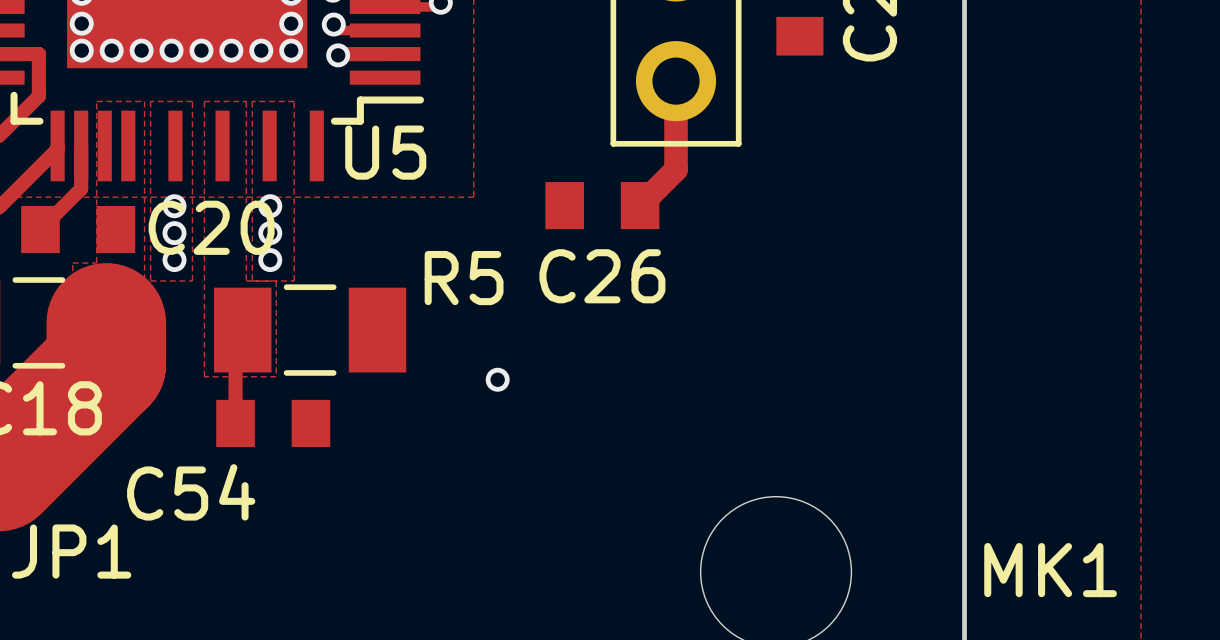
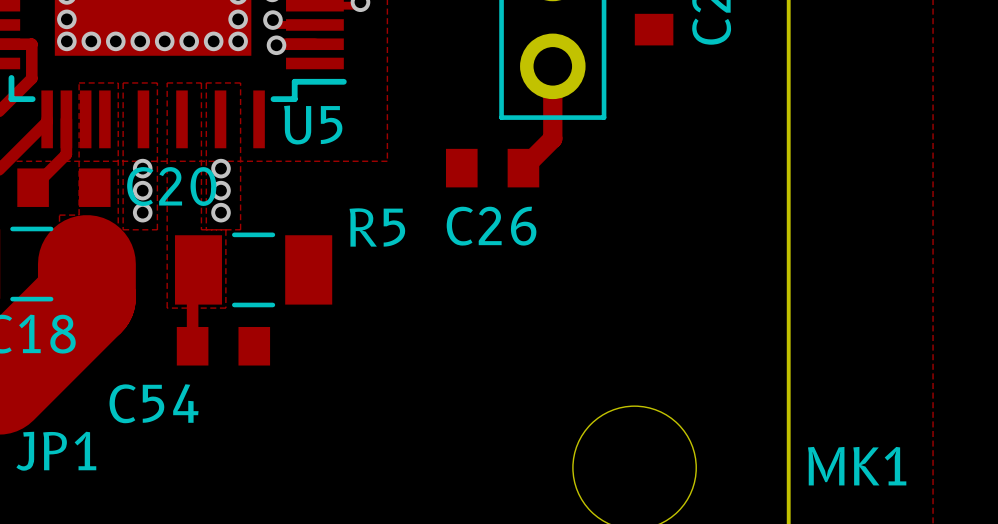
via: (497, 379) -> none

